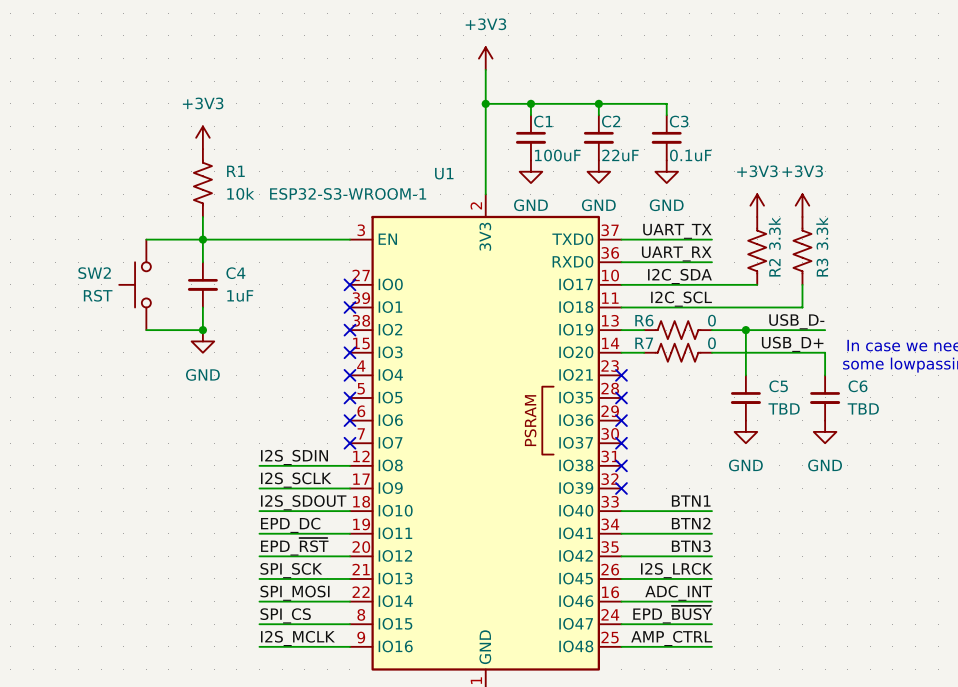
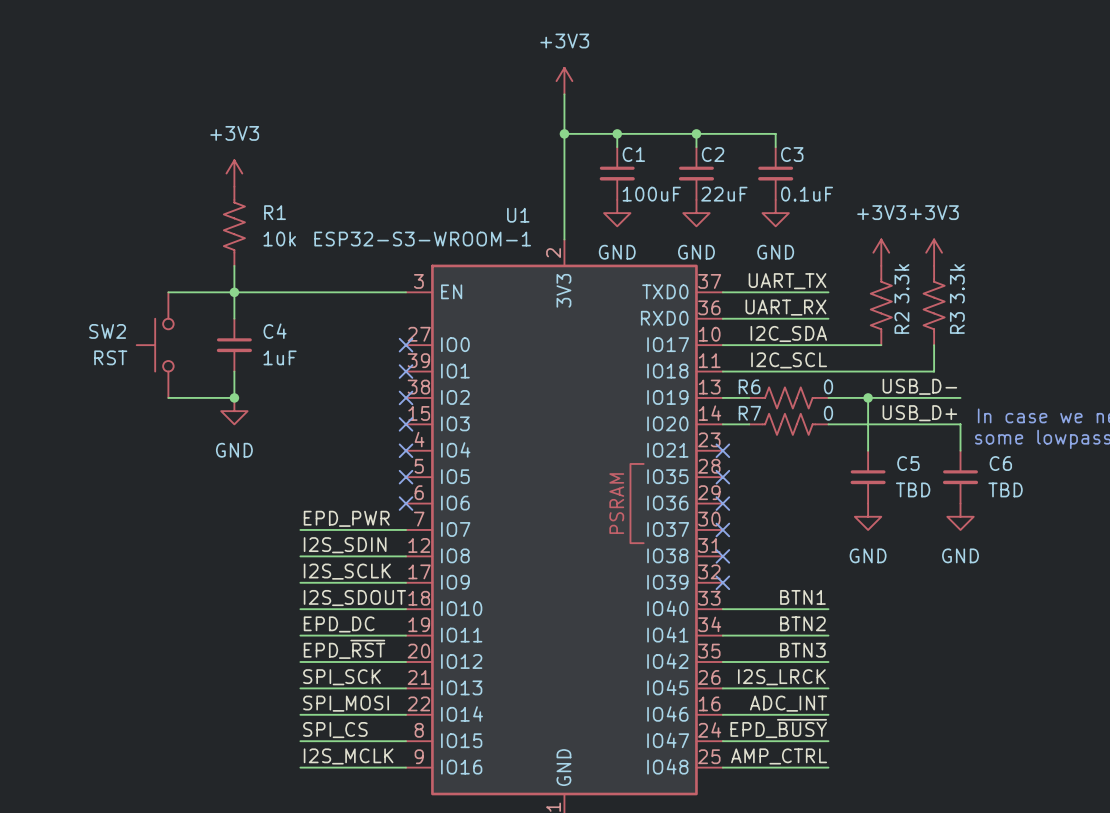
label: none -> EPD_PWR (346, 518)
wire: none -> (300, 529) (406, 529)
no-connect mark: (349, 443) -> none

